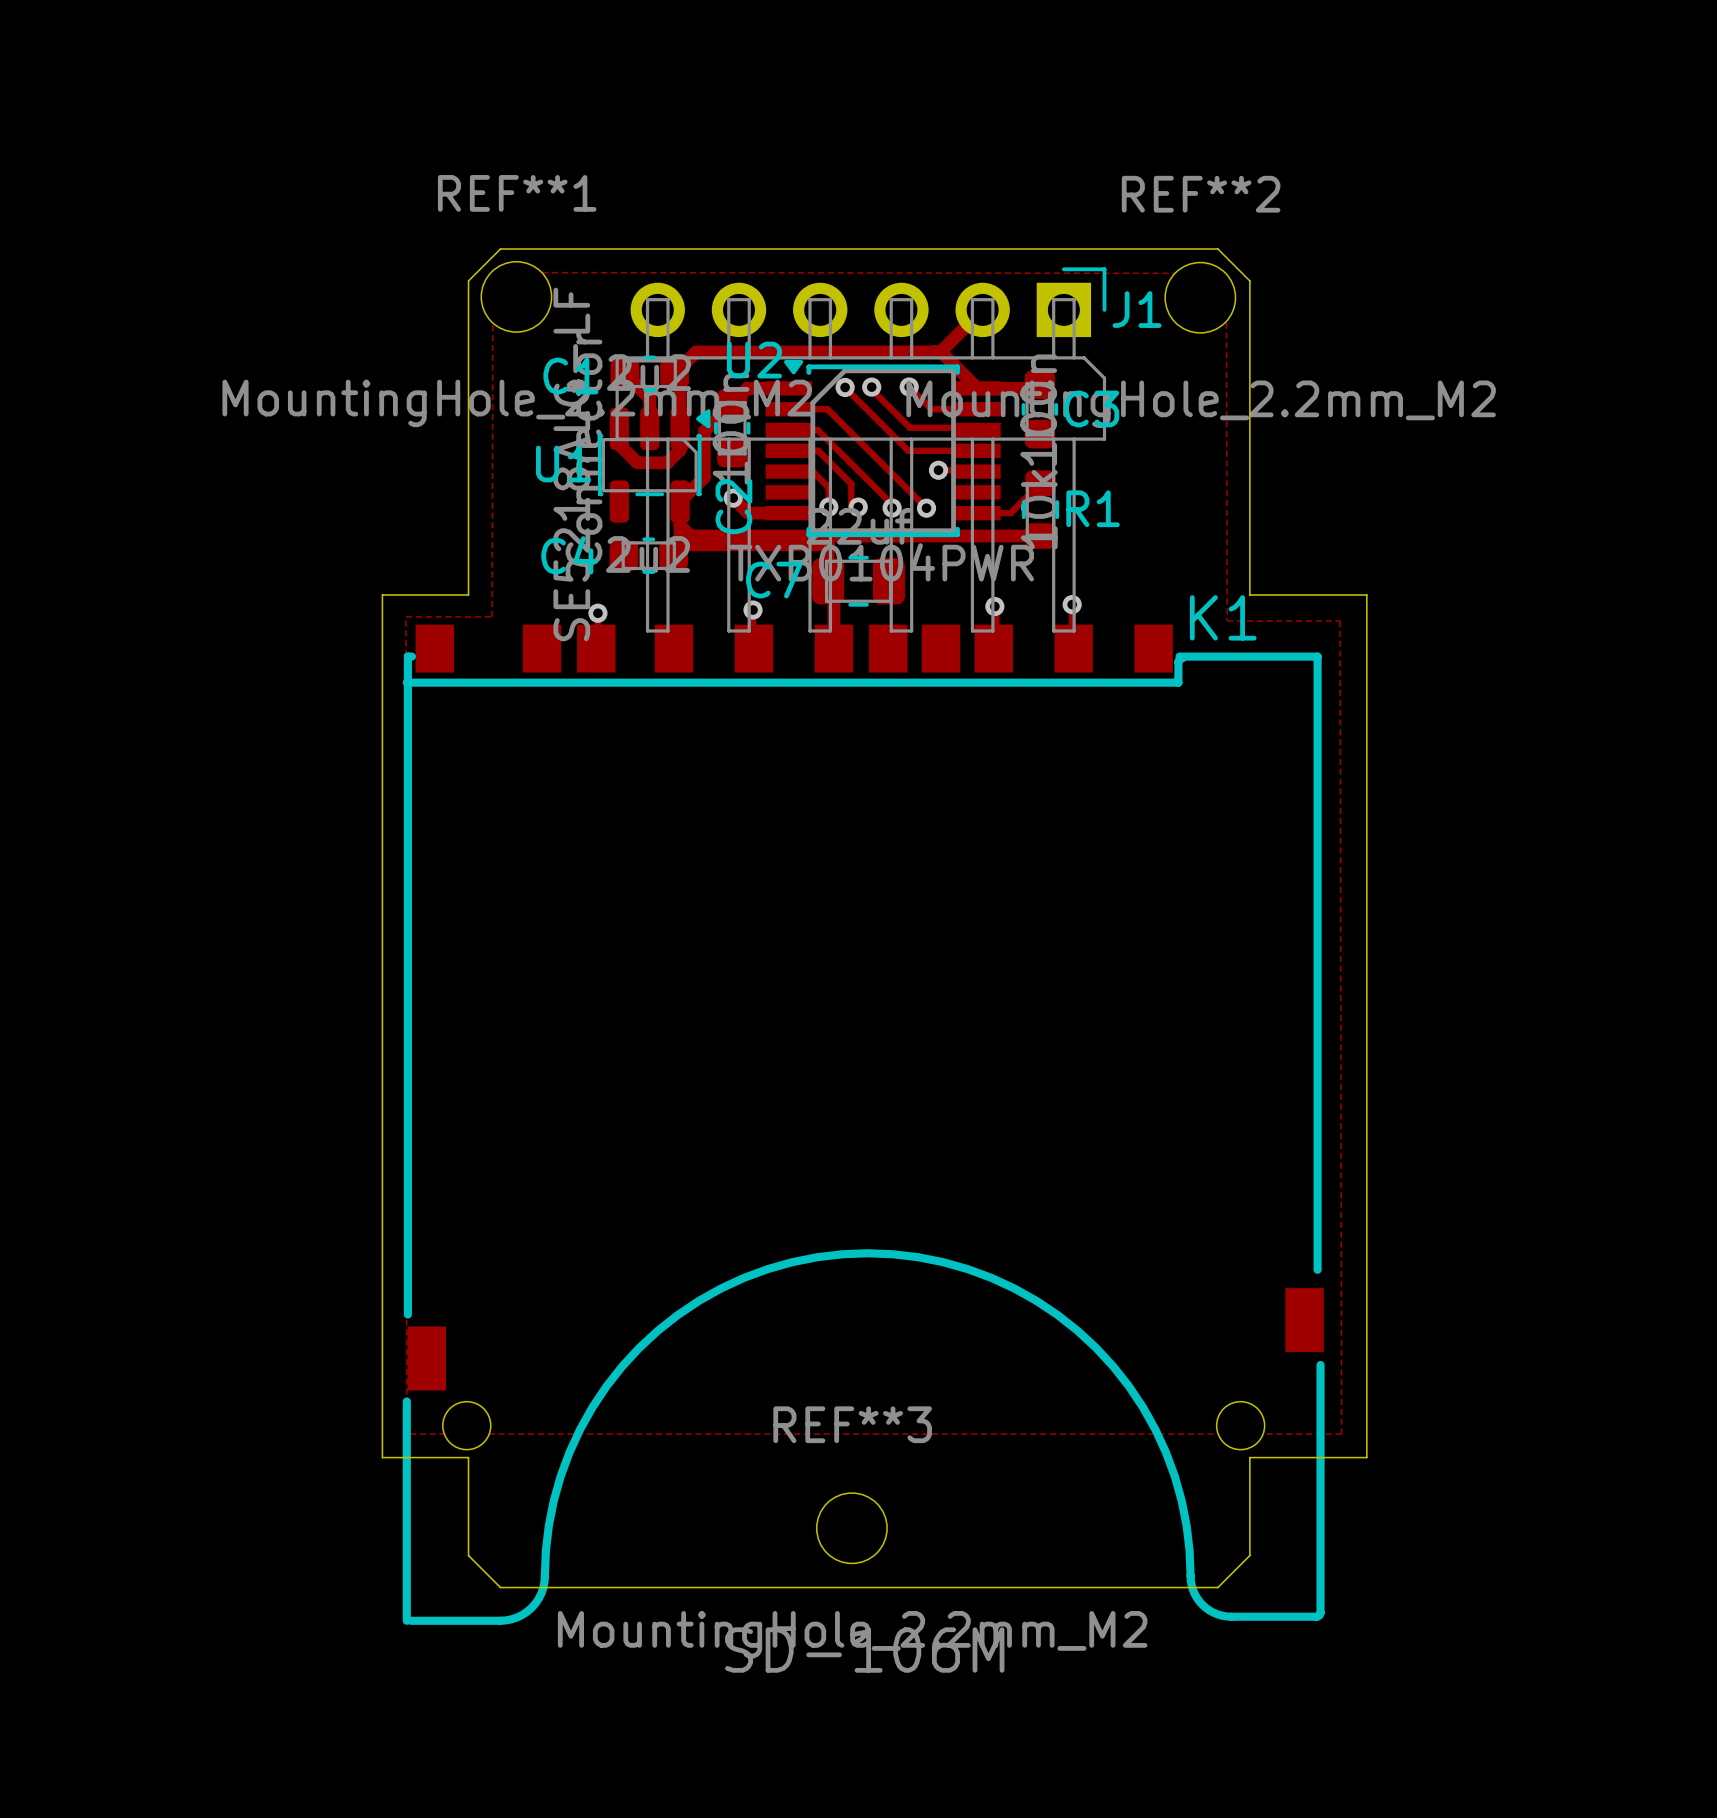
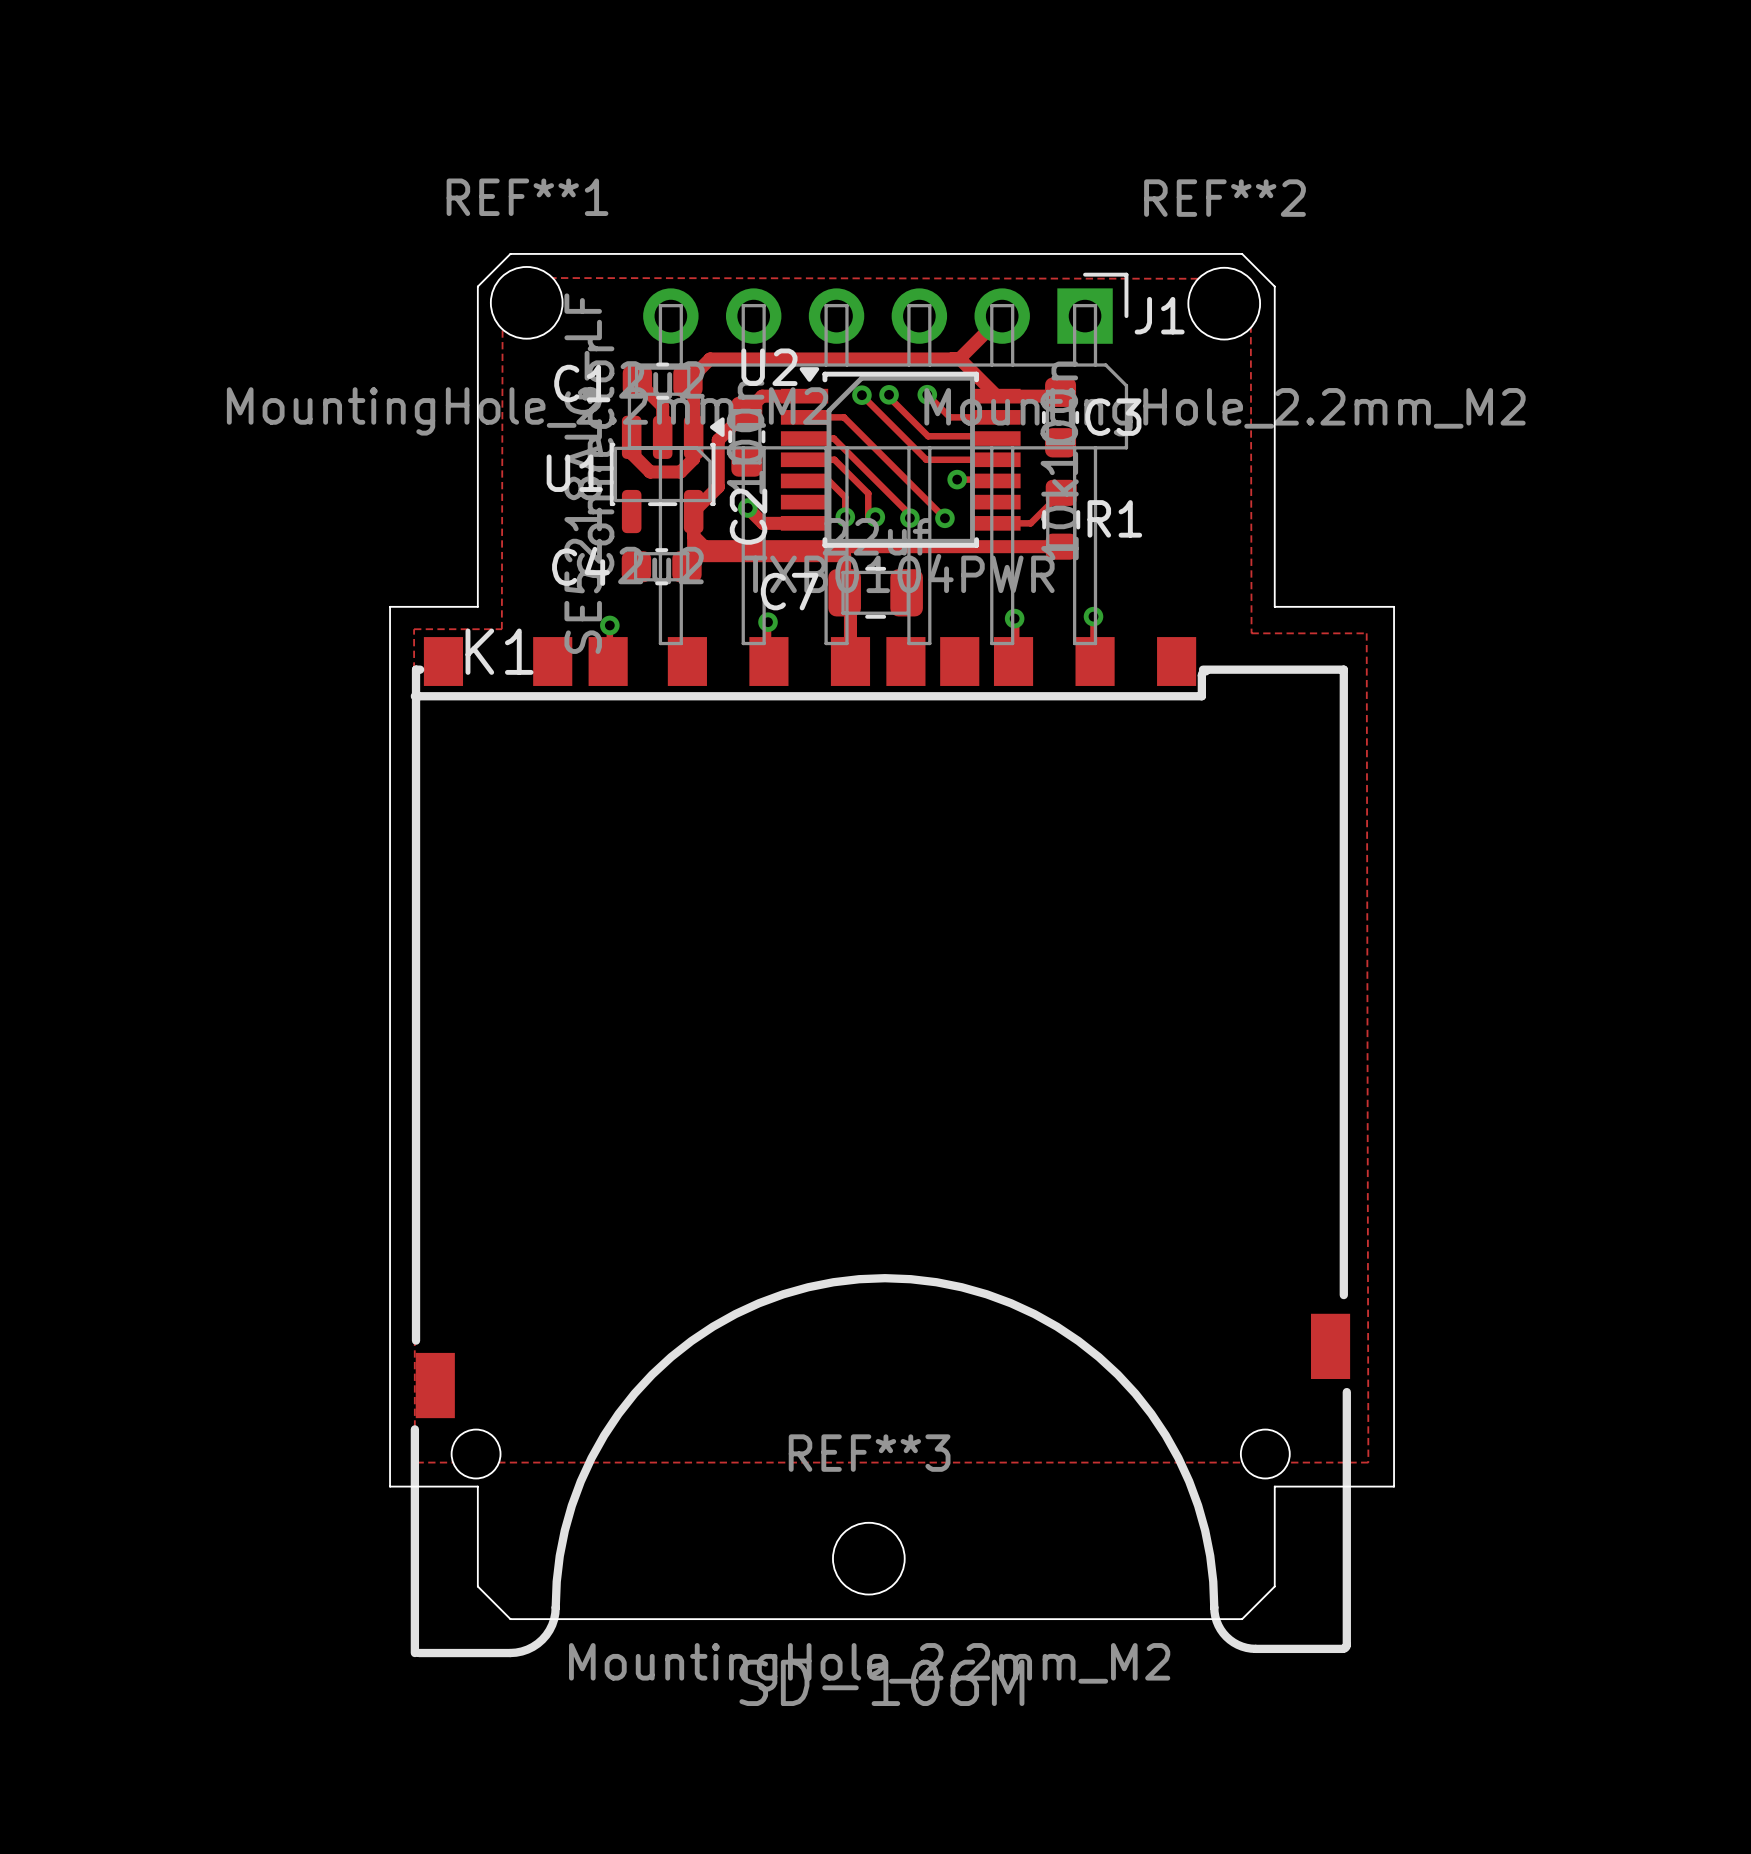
K1 name position: K1 (1223, 617) -> K1 (499, 651)

